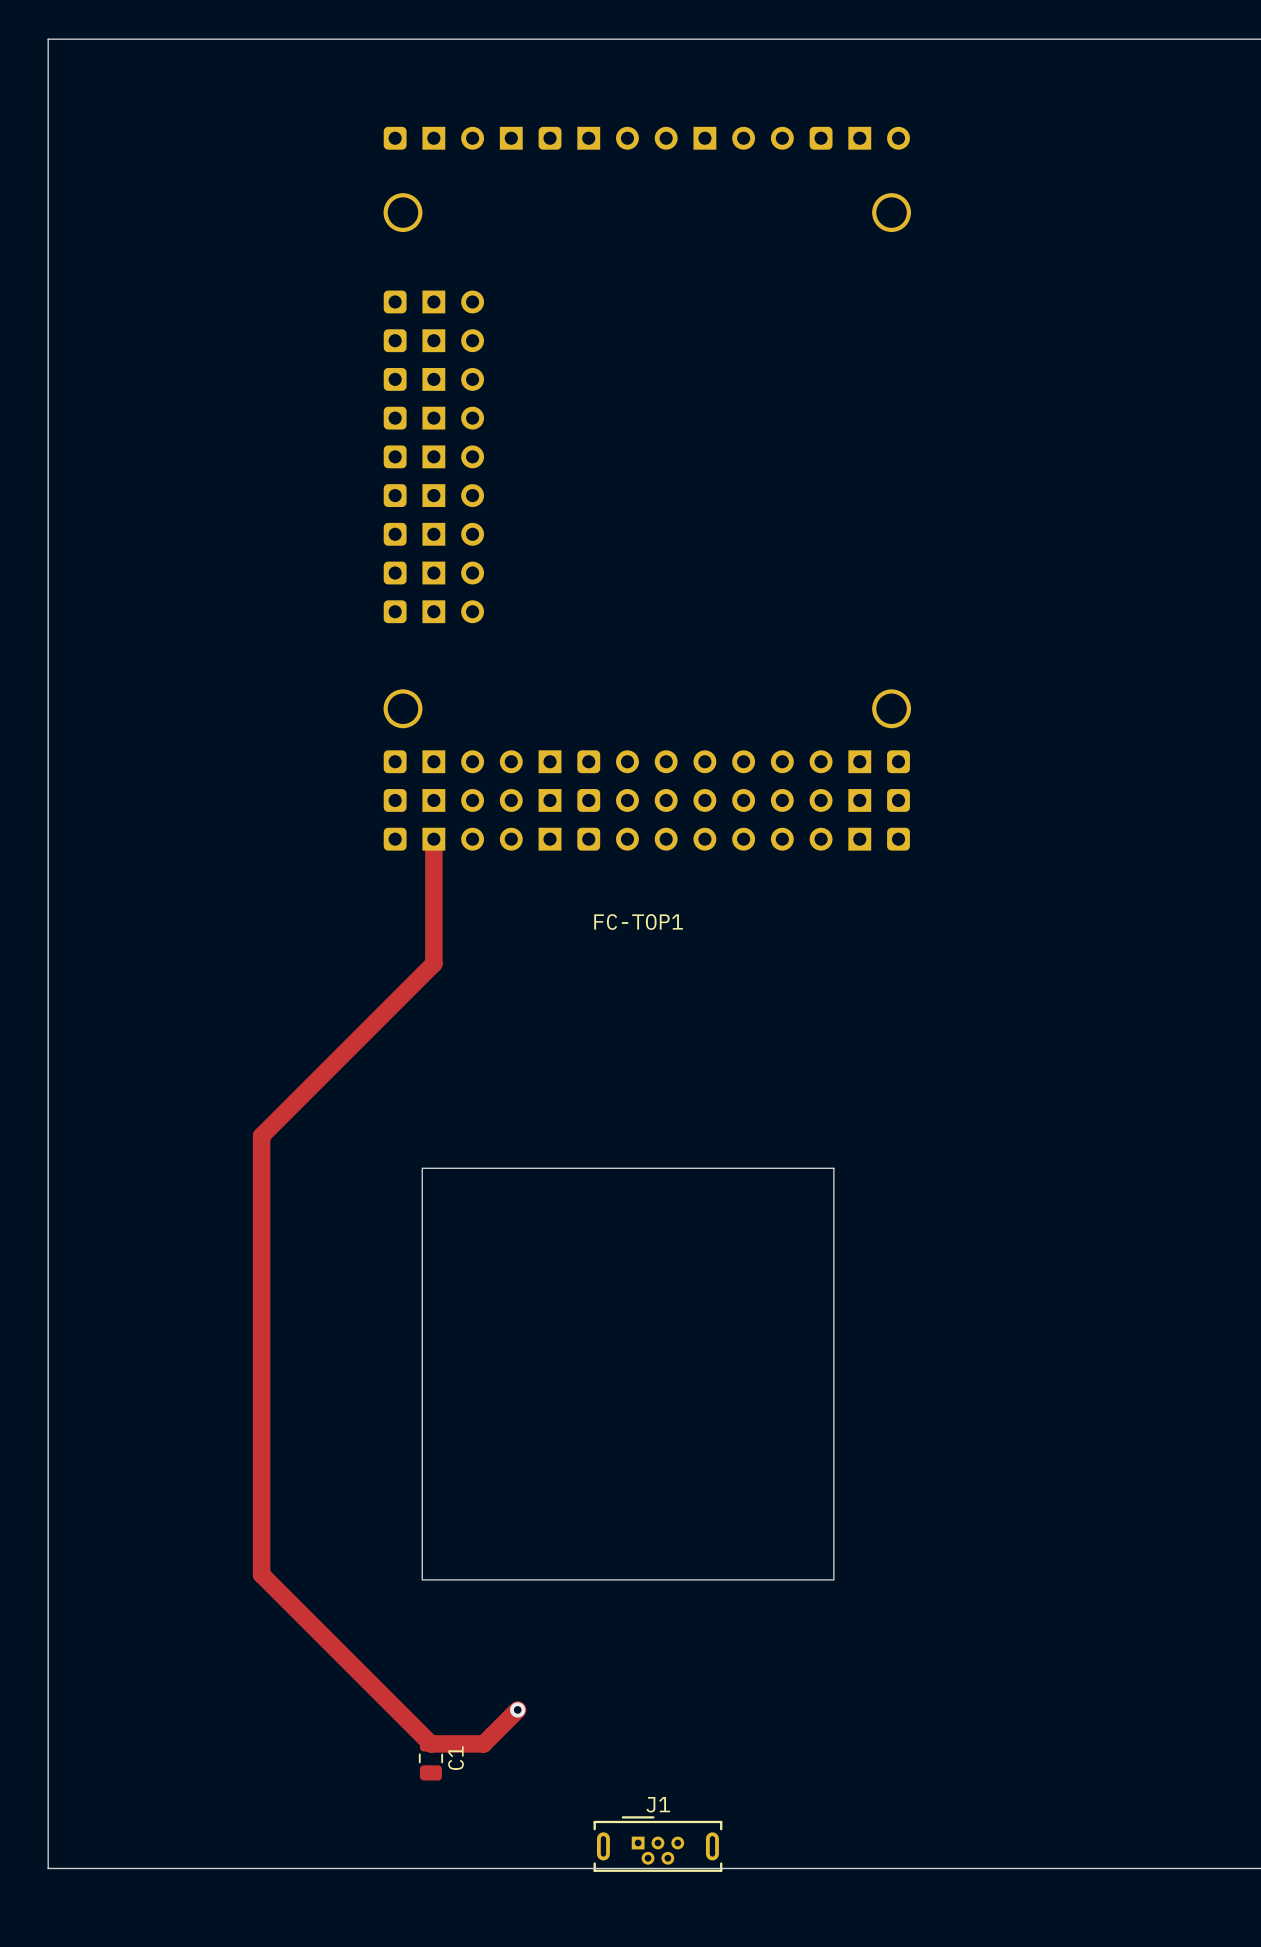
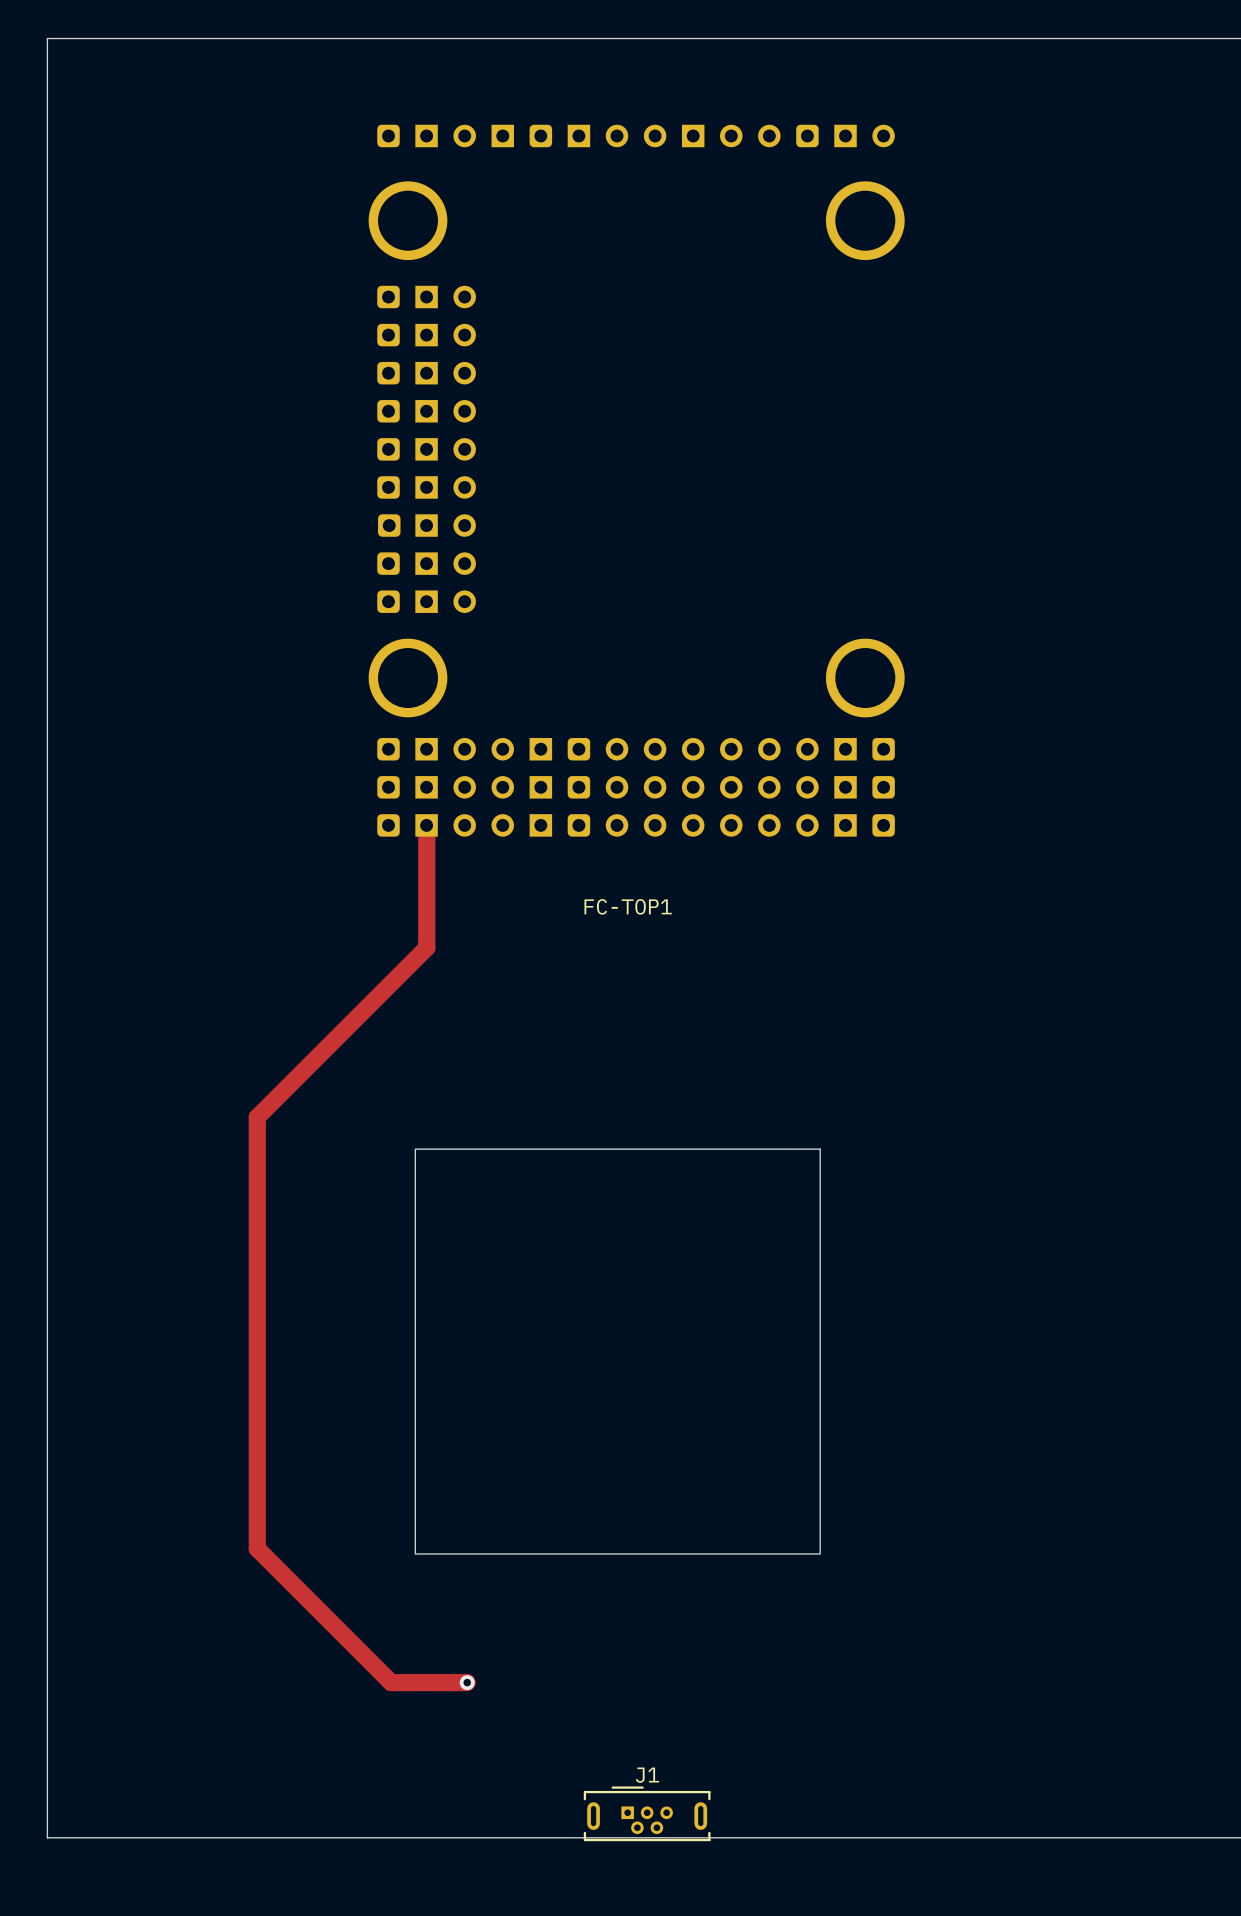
FC-TOP1 footprint: [383, 126, 912, 851] -> [368, 124, 905, 837]
track: (517, 1709) (483, 1743) (430, 1743) (397, 1710) -> (467, 1682) (391, 1682)
via position: (517, 1709) -> (467, 1682)
C1: (430, 1758) -> none

